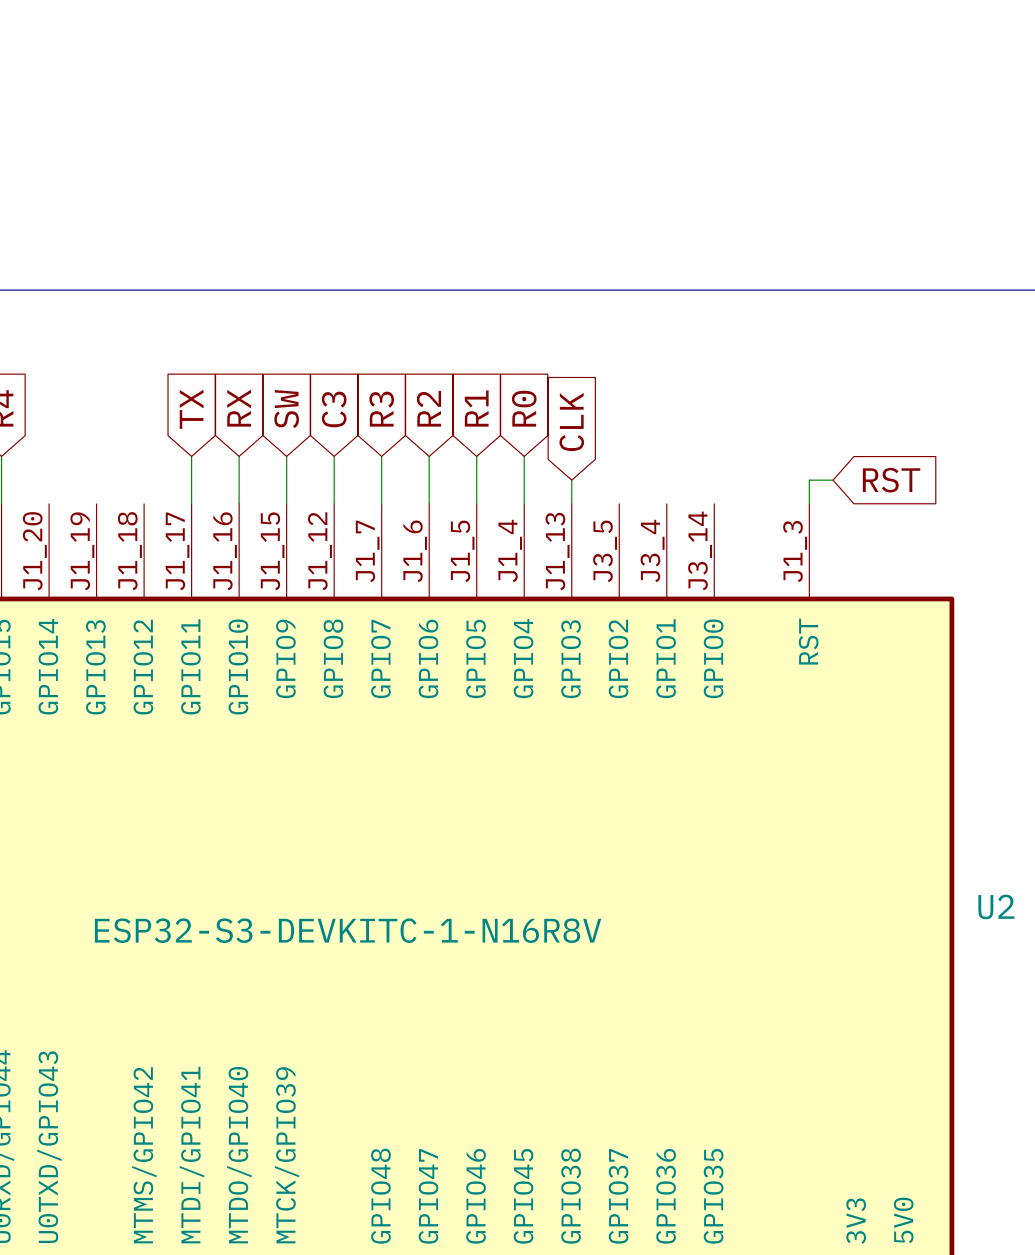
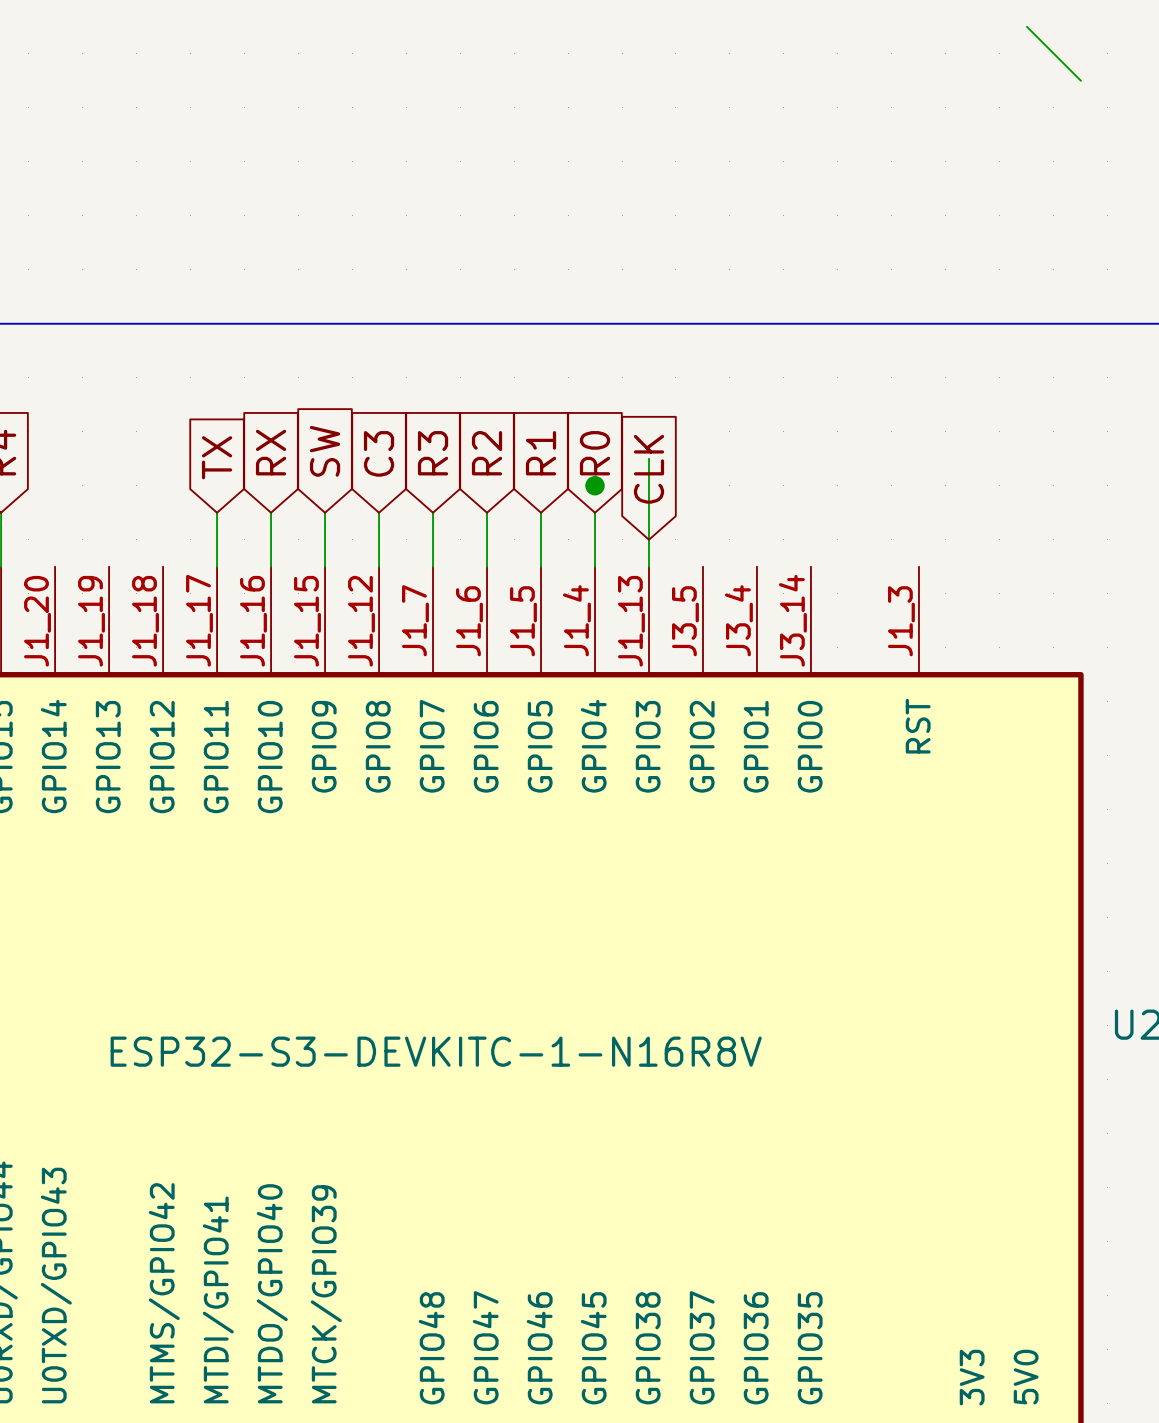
wire: none -> (1026, 26) (1080, 80)
wire: none -> (648, 458) (648, 539)
junction: none -> (595, 485)
wire: (833, 480) (809, 480) (809, 503) -> none
global label: RST (891, 480) -> none

